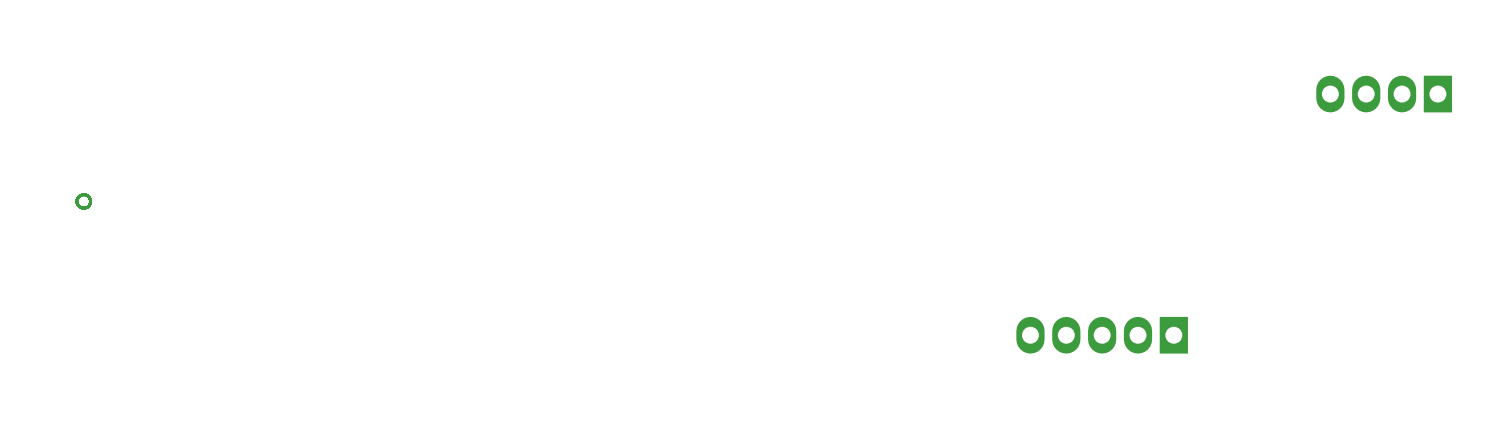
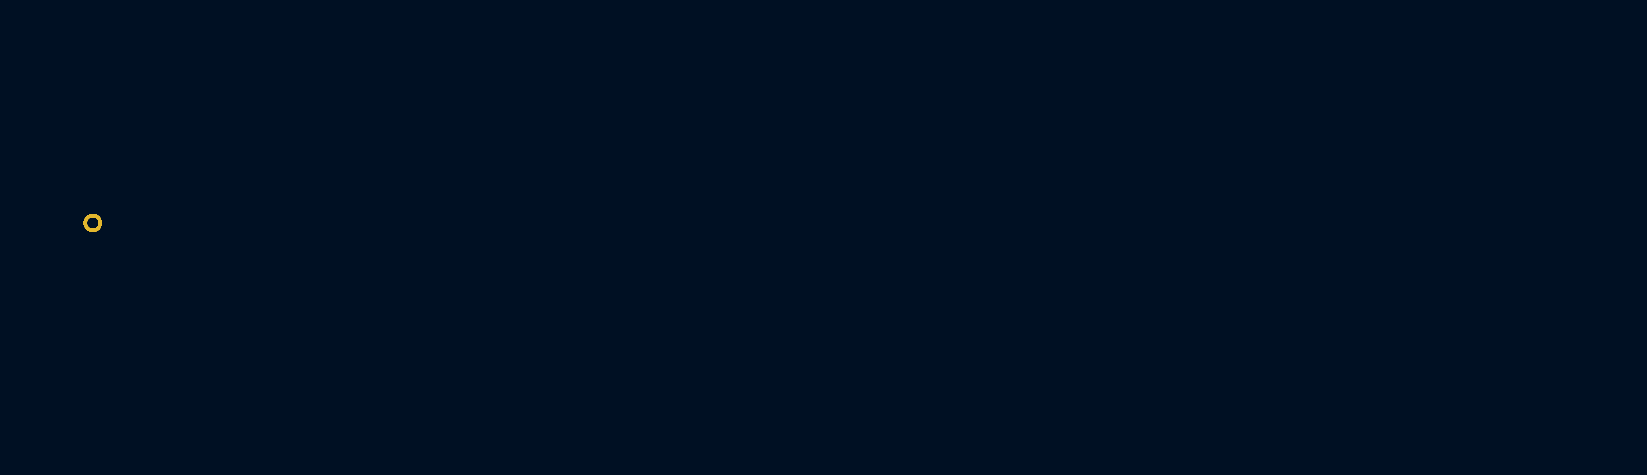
part: (1384, 94) -> none
part: (1102, 335) -> none

